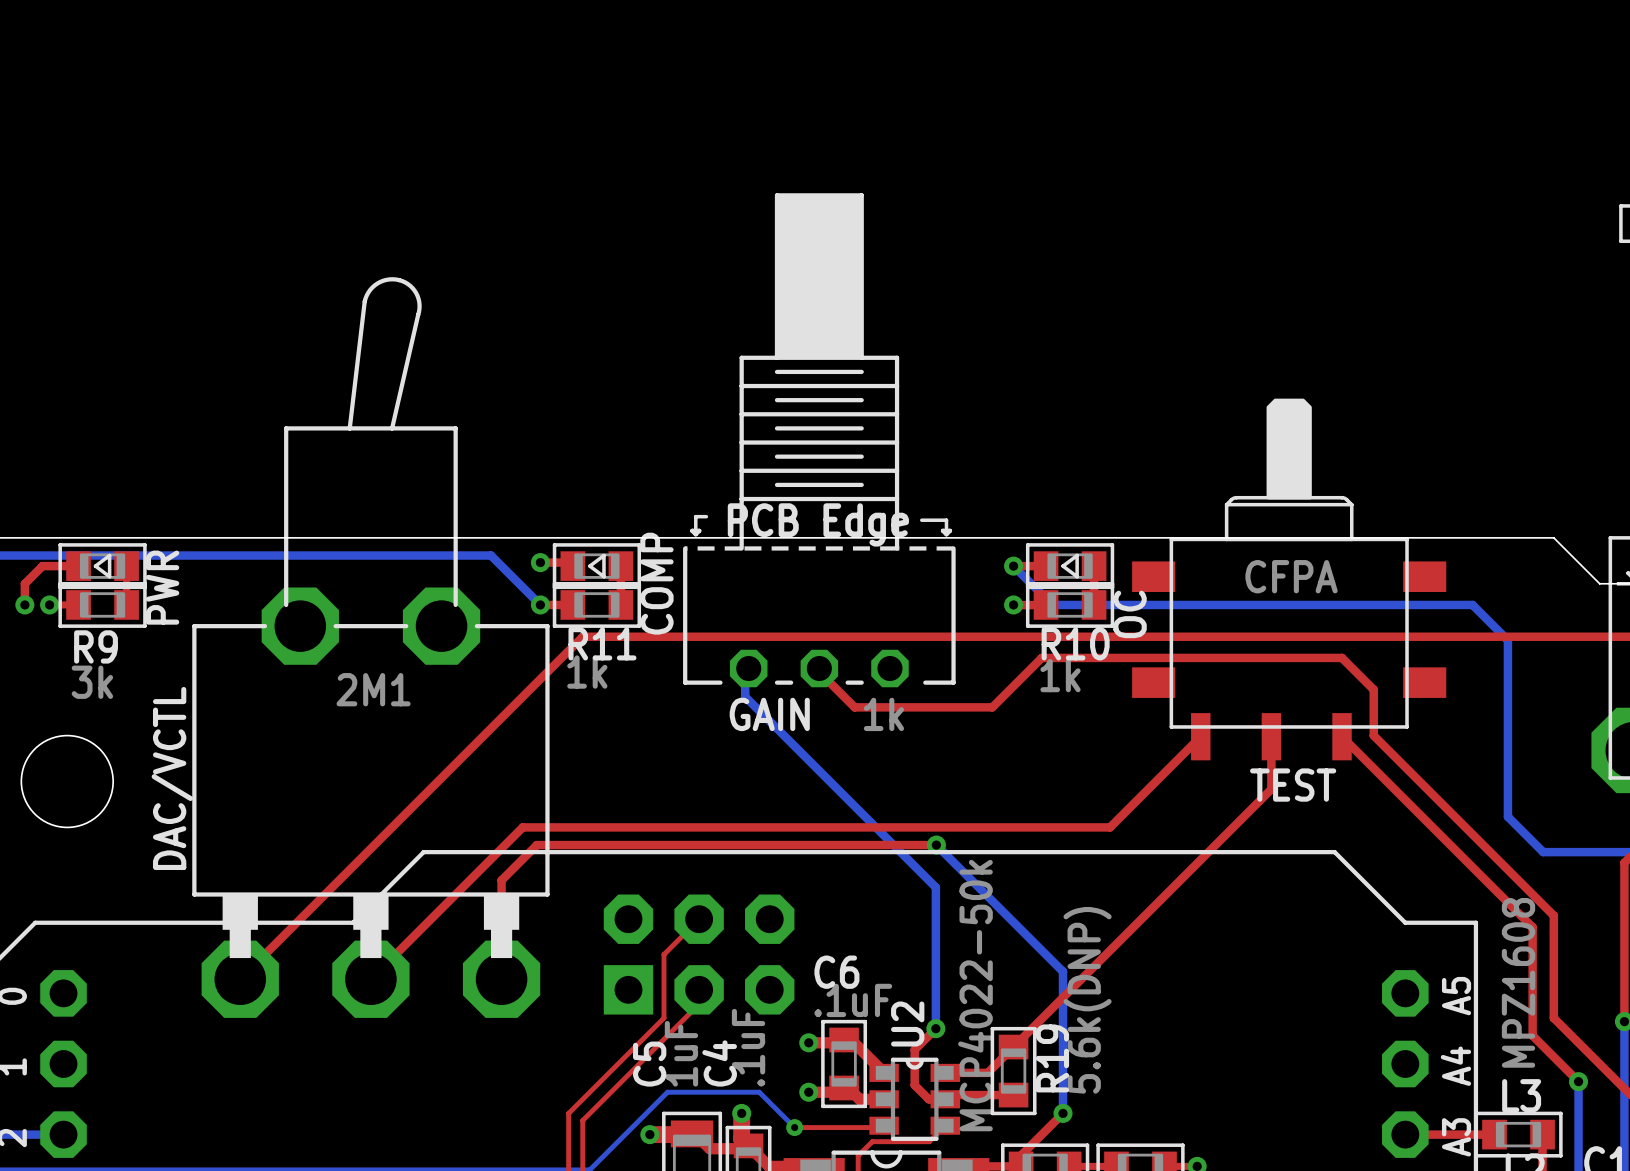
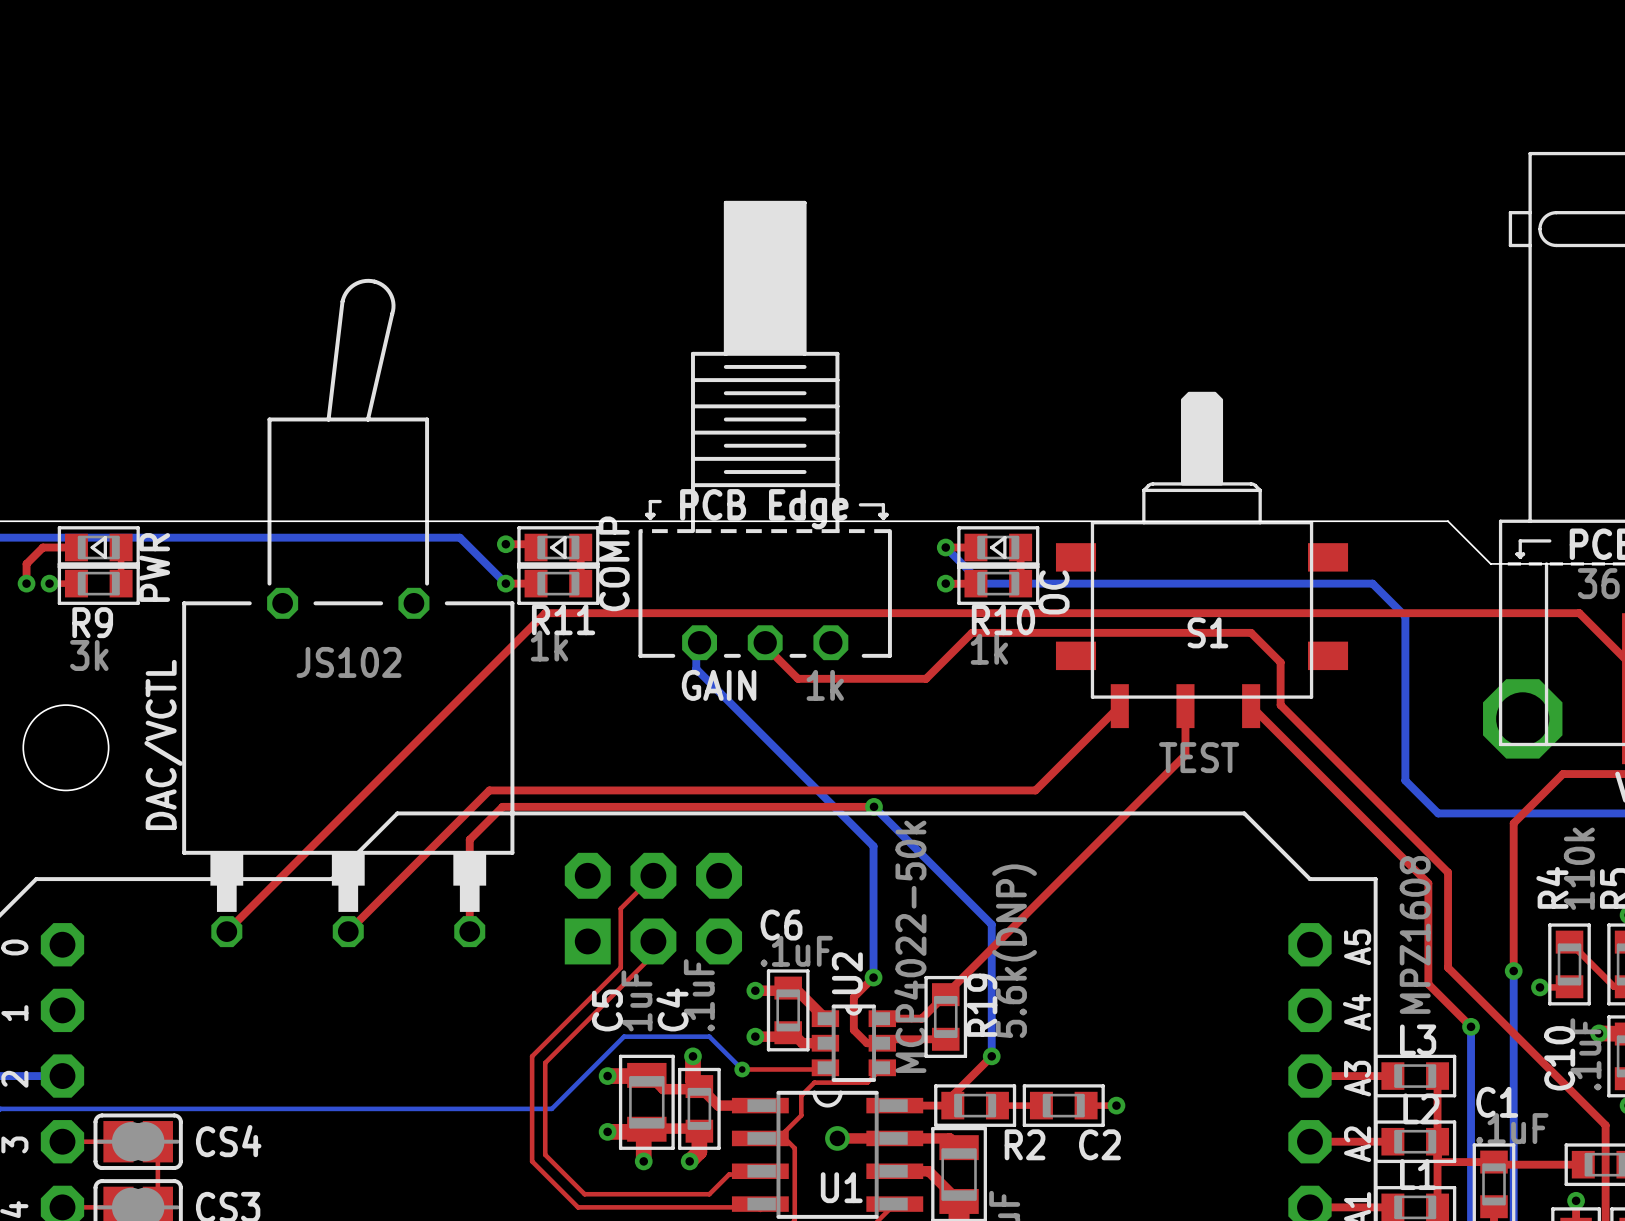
DAC/VCTL footprint: [192, 277, 550, 1018] -> [182, 278, 515, 948]
TEST value: CFPA (1291, 576) -> TEST (1199, 757)
DAC/VCTL value: 2M1 (373, 689) -> JS102 (349, 662)
TEST name: TEST (1293, 785) -> S1 (1207, 632)

